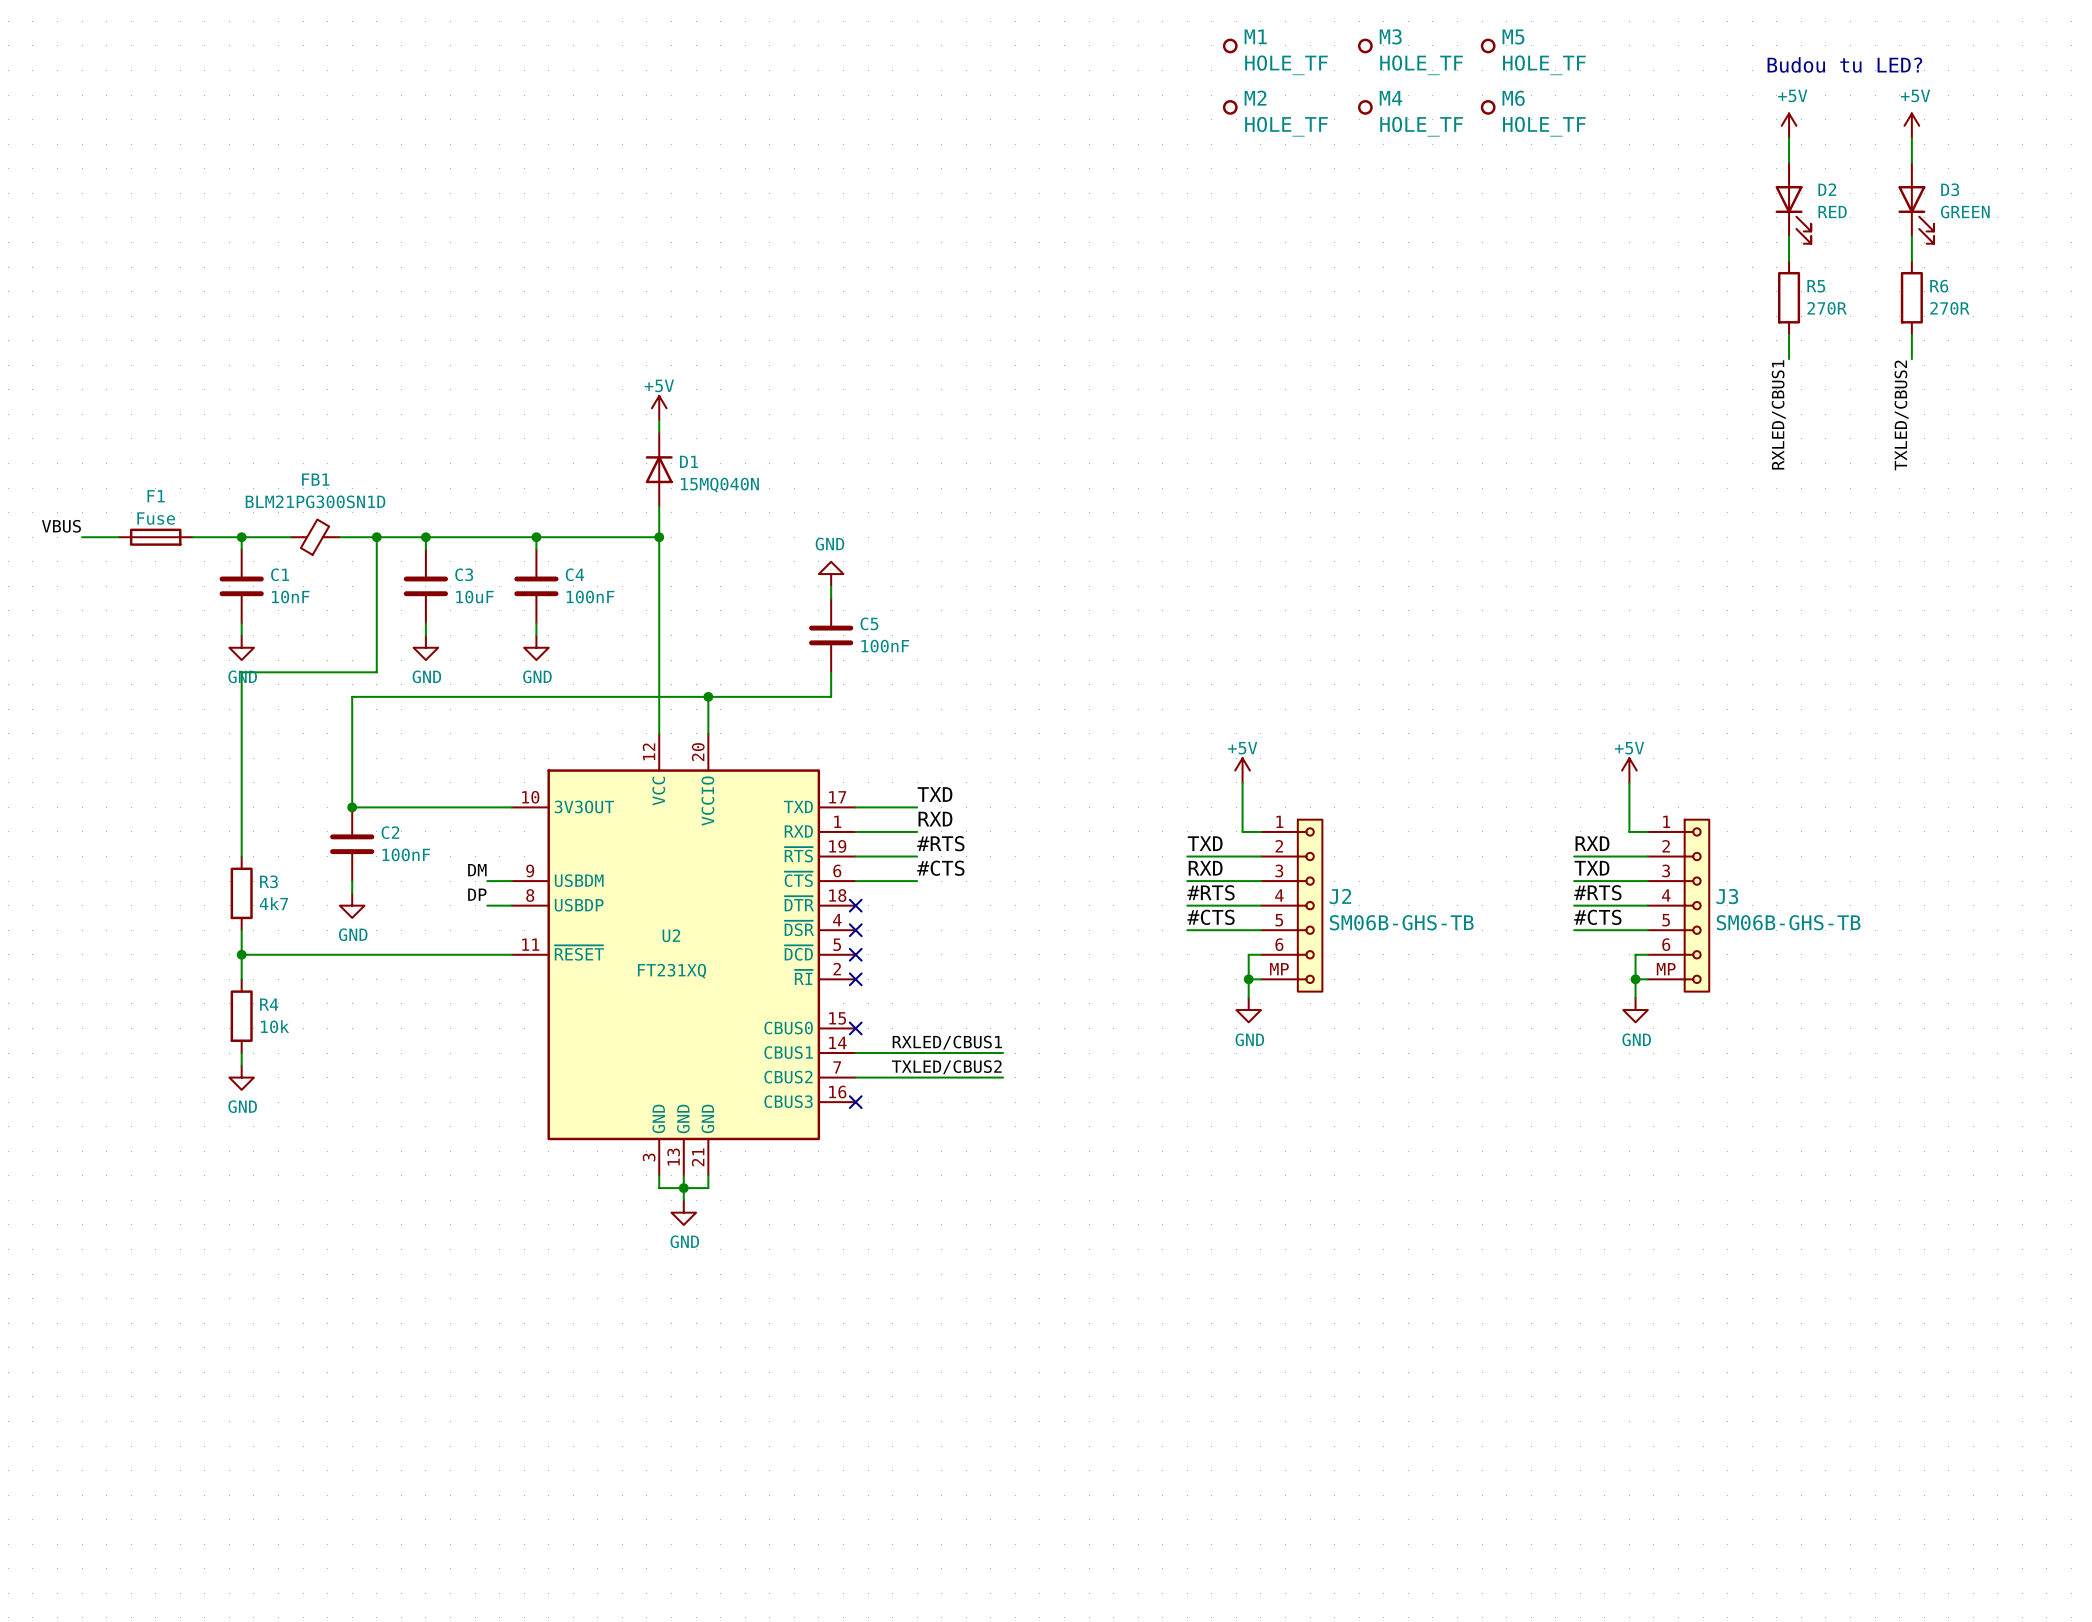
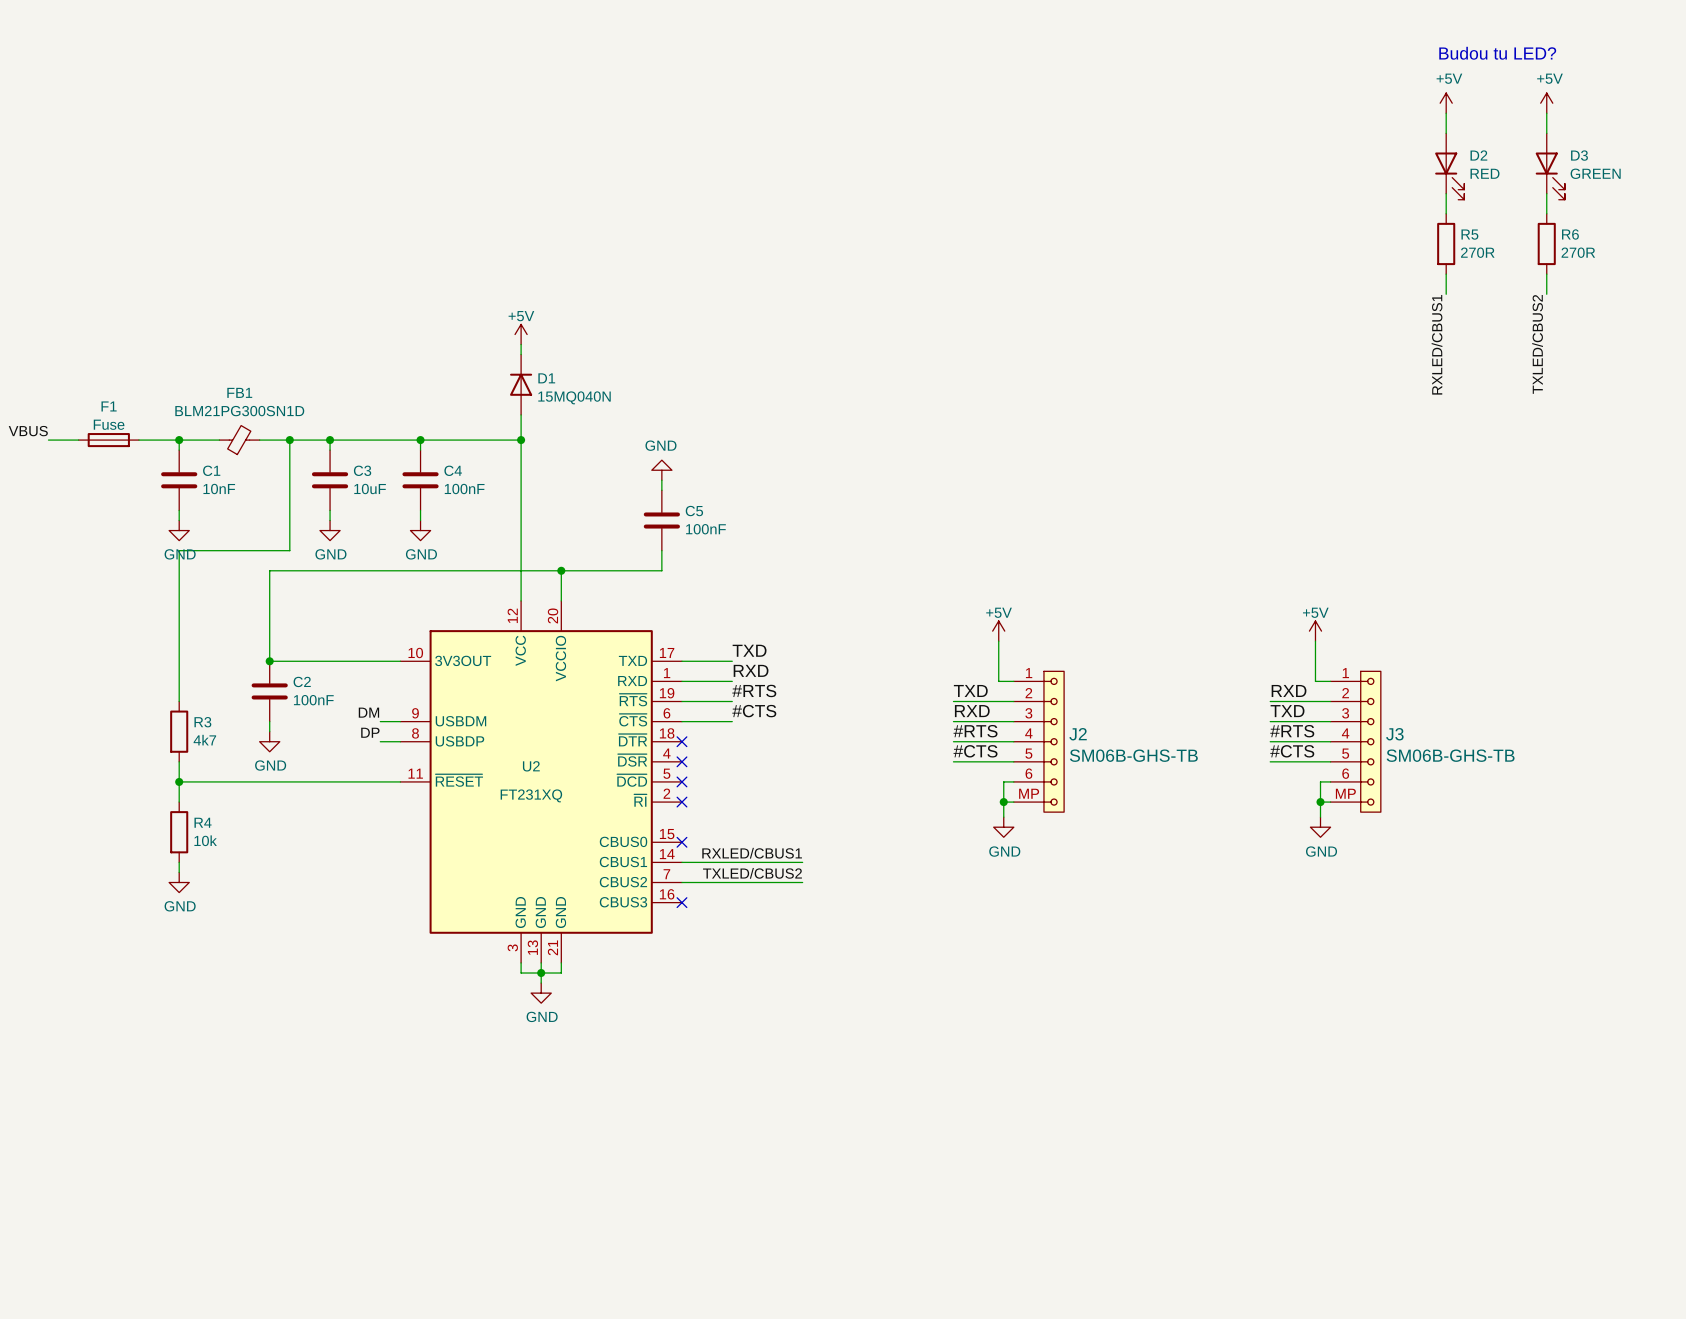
M1: HOLE_TF (1230, 45) -> none
M3: HOLE_TF (1365, 45) -> none
M5: HOLE_TF (1488, 45) -> none
M2: HOLE_TF (1230, 107) -> none
M4: HOLE_TF (1365, 107) -> none
M6: HOLE_TF (1488, 107) -> none

